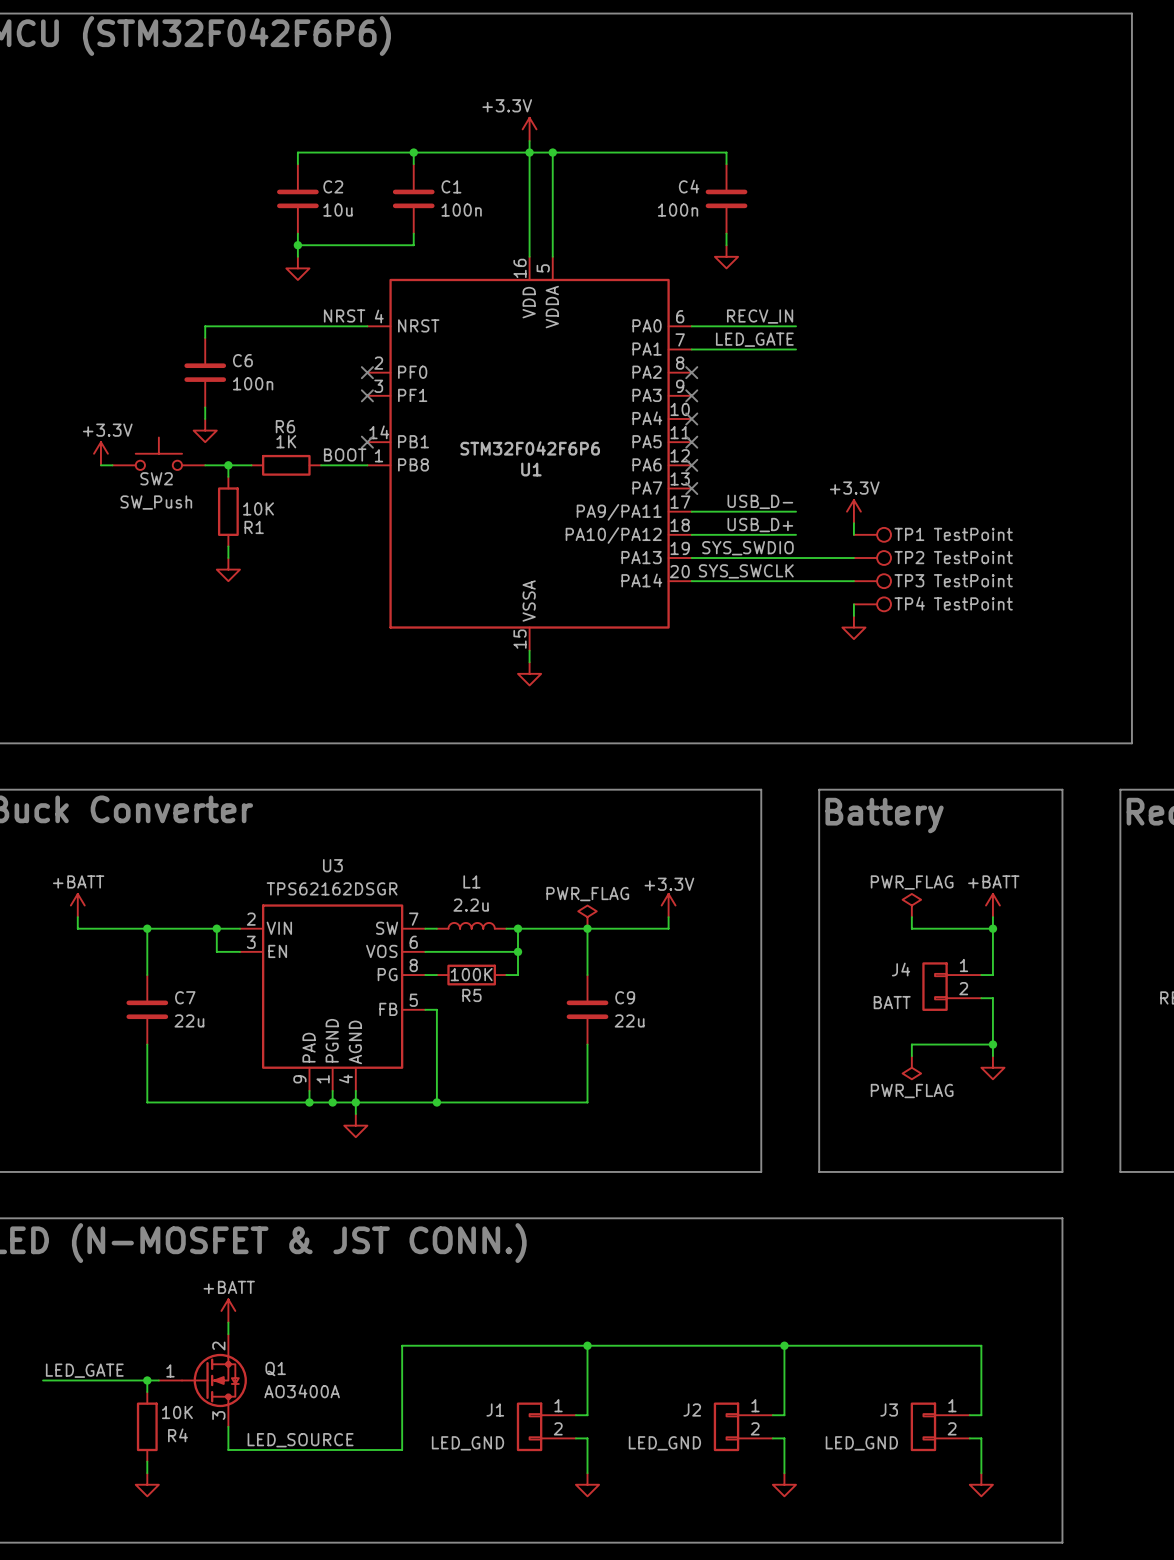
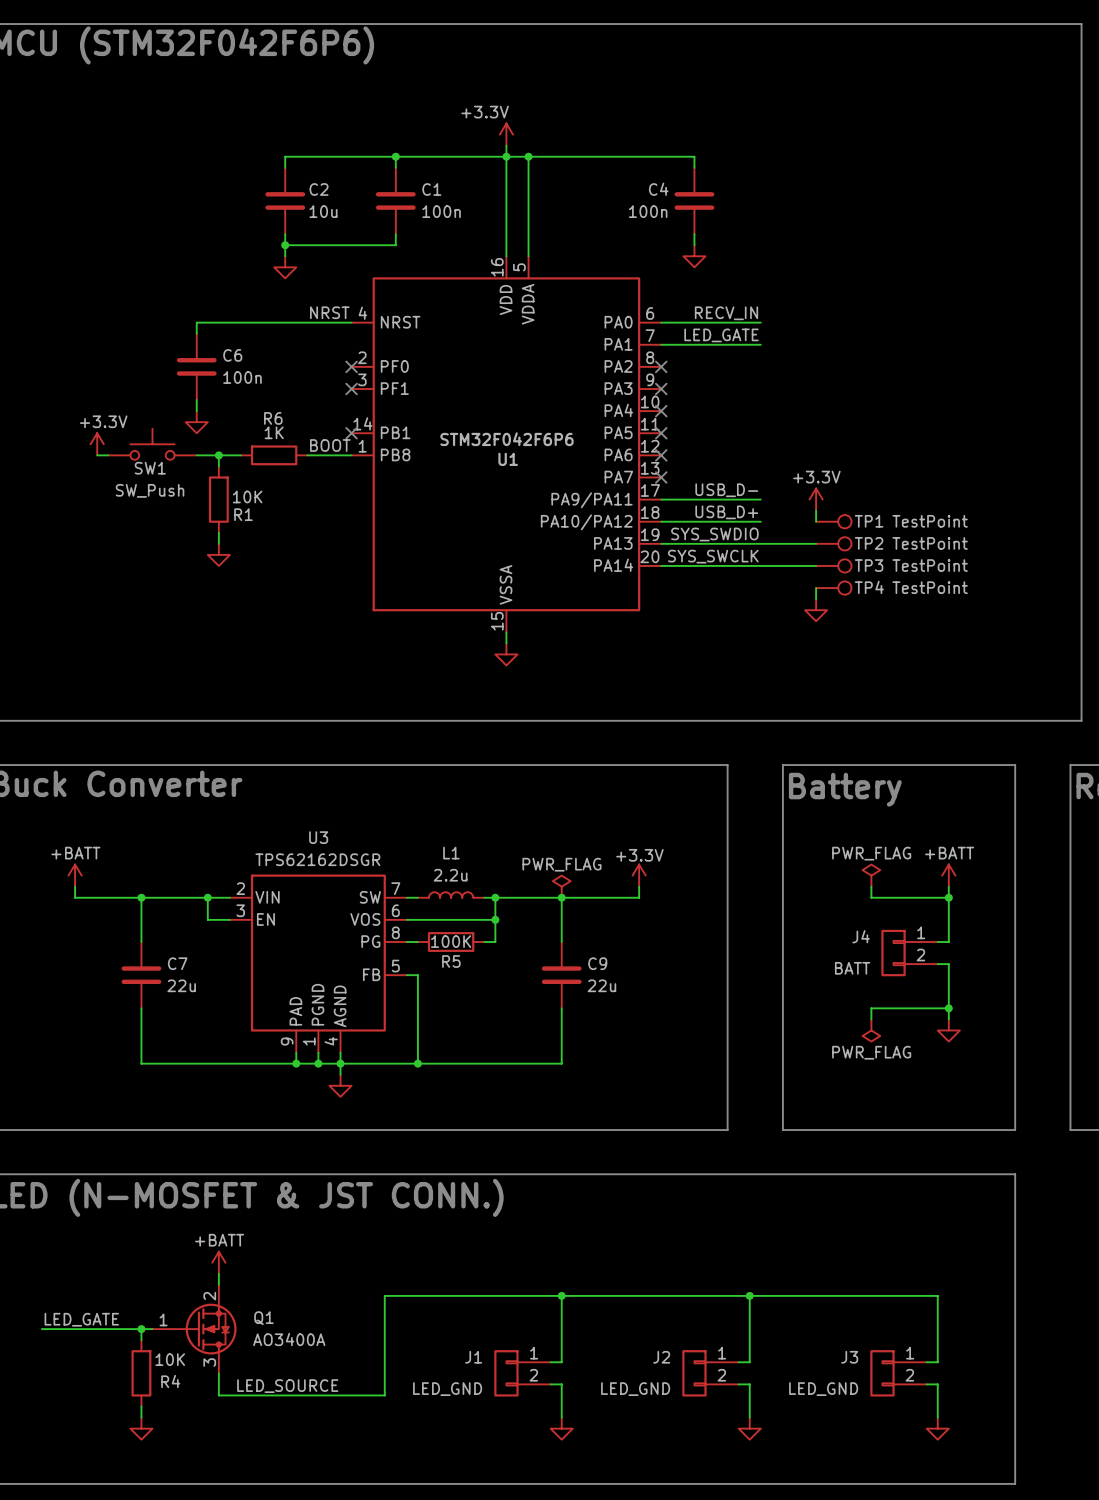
SW2 name: SW2 (156, 478) -> SW1 (150, 468)

